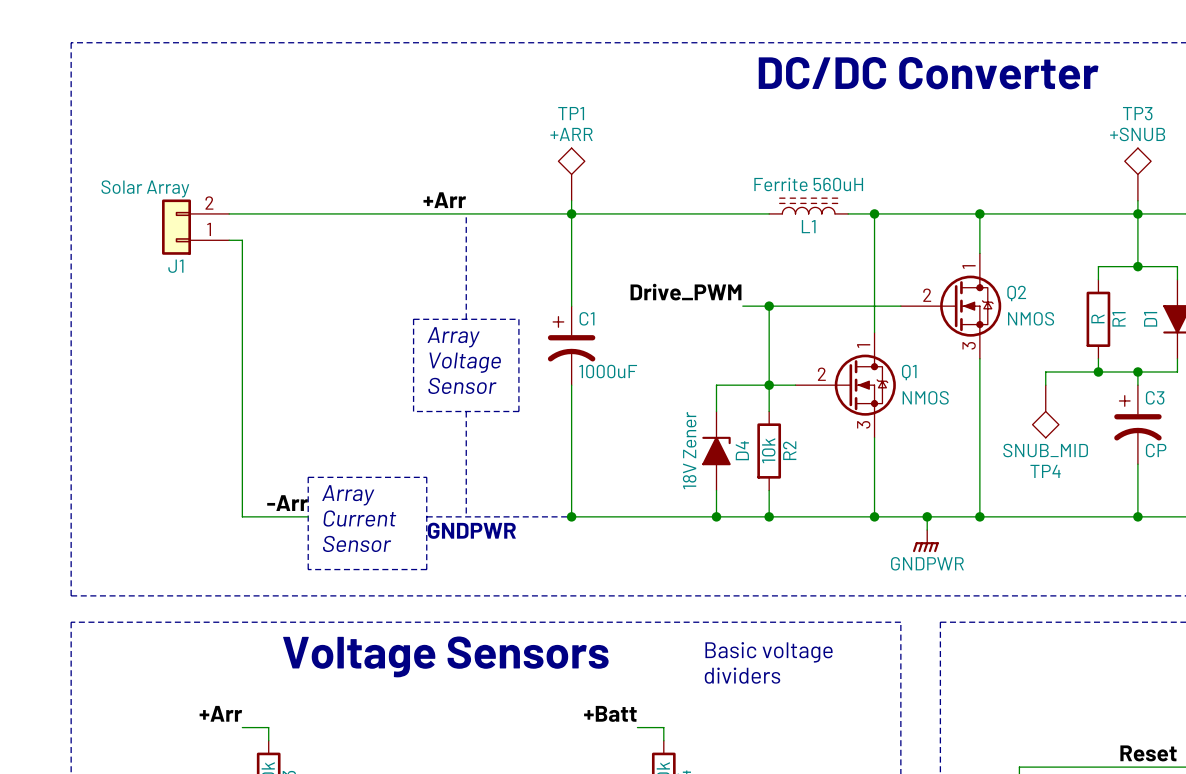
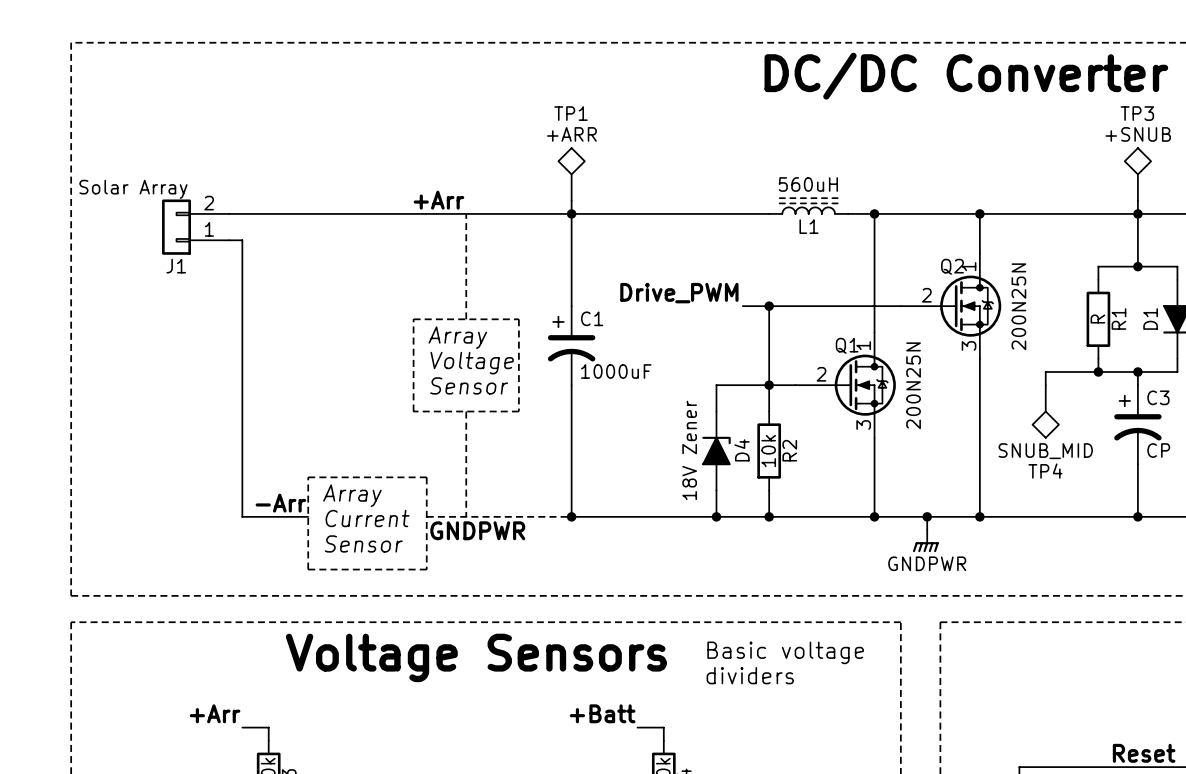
L1 value: Ferrite 560uH (808, 184) -> 560uH (808, 184)
Q2 name position: Q2 (1016, 293) -> Q2 (952, 266)
Q2 value: NMOS (1031, 318) -> 200N25N (1018, 306)
Q1 name position: Q1 (909, 372) -> Q1 (847, 345)
Q1 value: NMOS (925, 397) -> 200N25N (913, 385)

